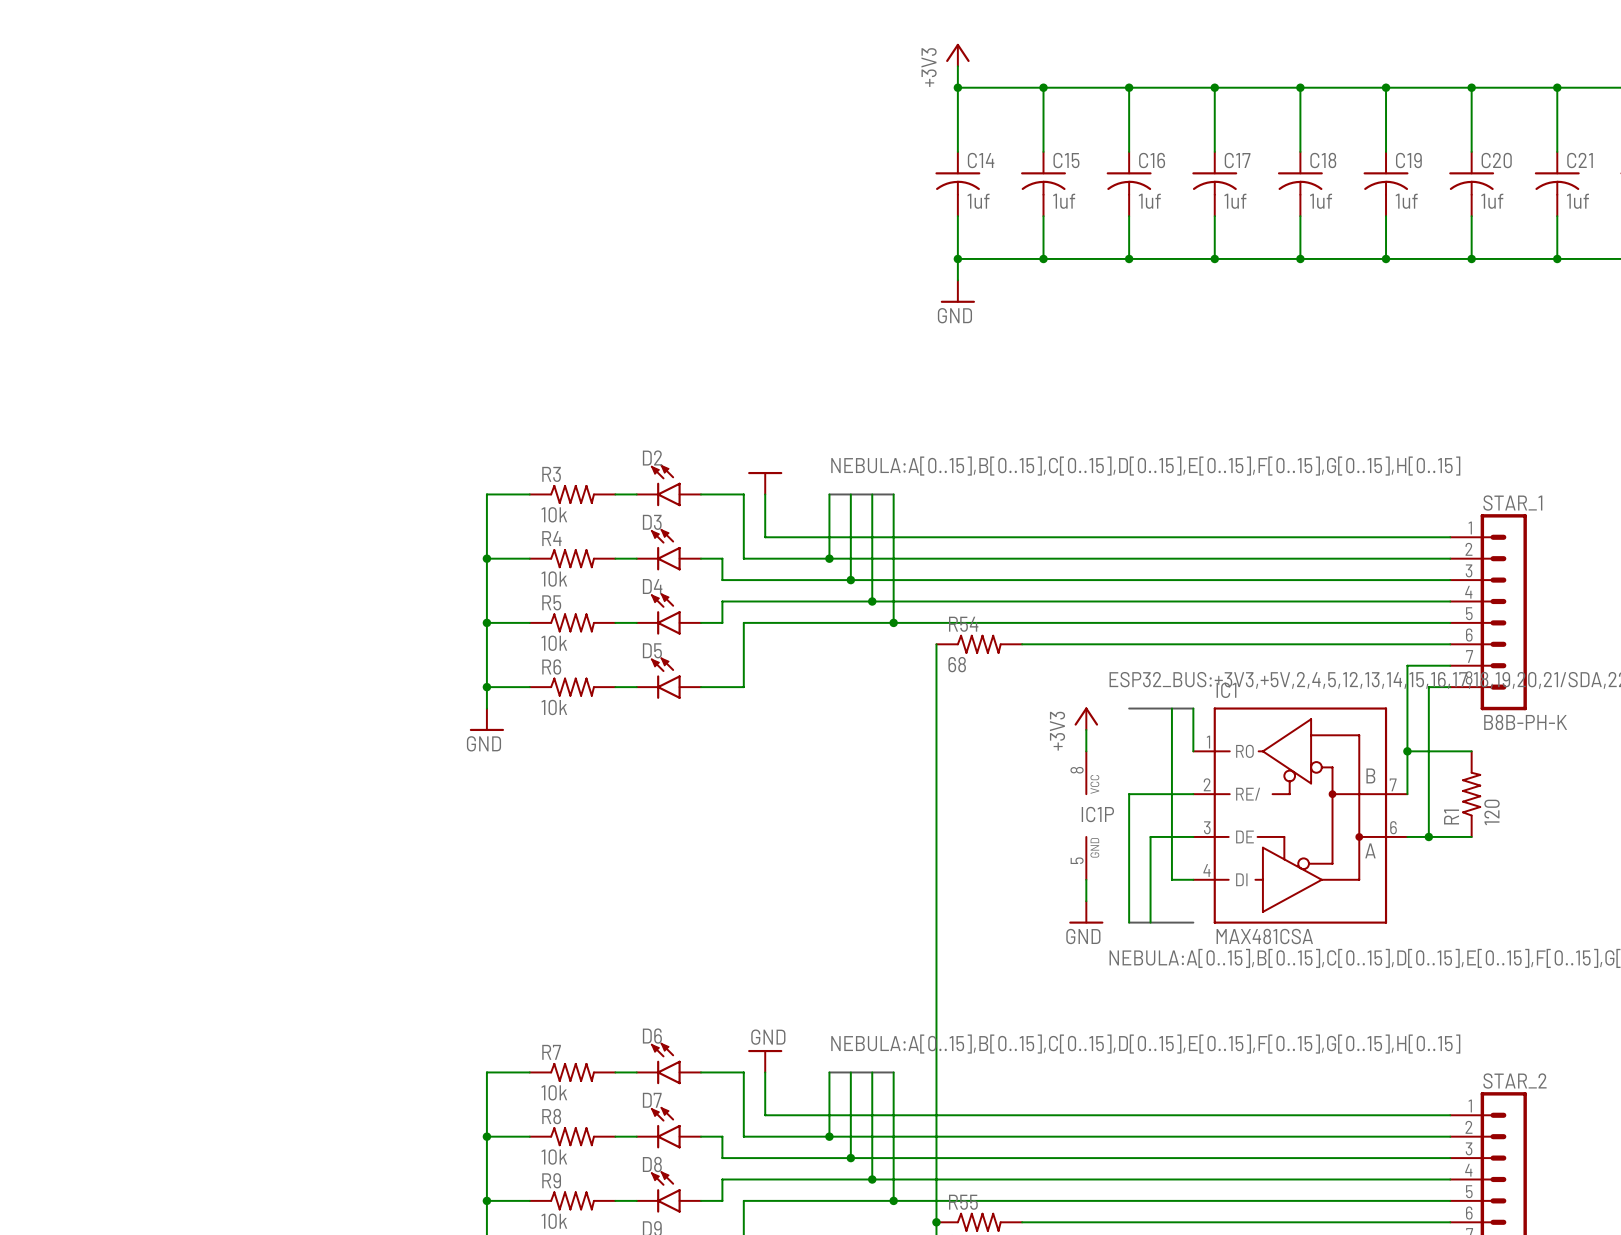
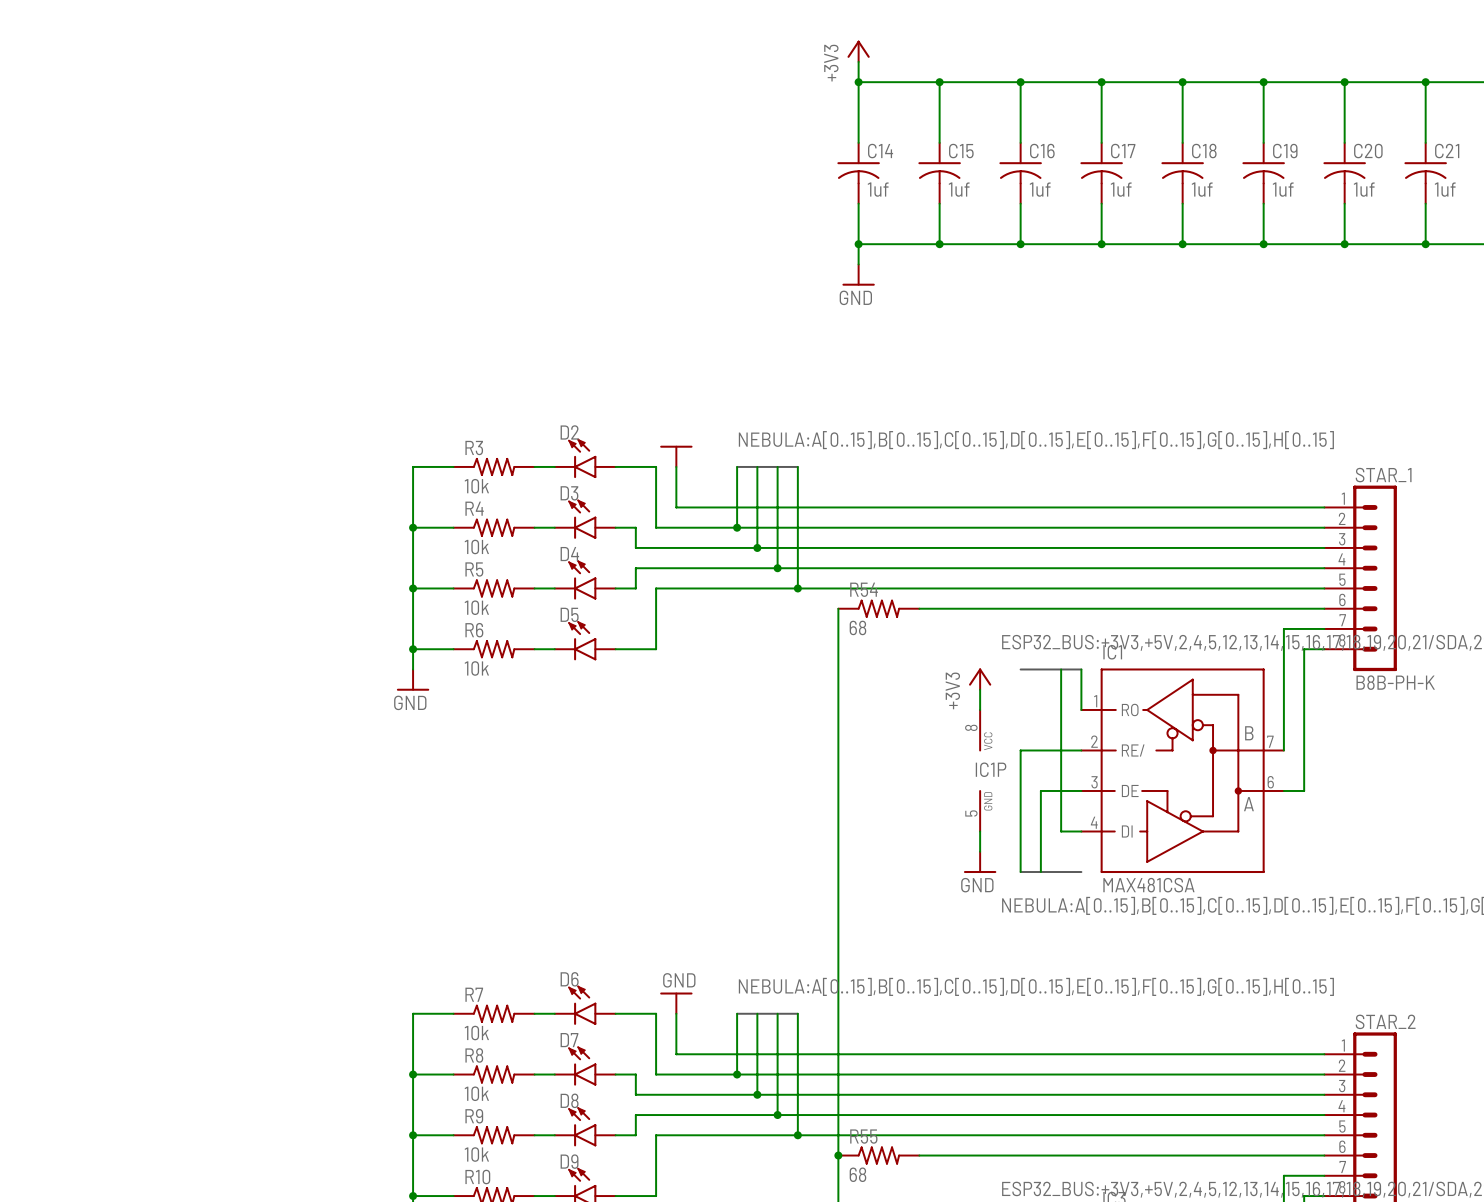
wire: (1407, 751) (1471, 751) -> none
junction: (1407, 751) -> none
R1: 120 (1471, 794) -> none
wire: (1428, 836) (1471, 836) -> none
junction: (1428, 836) -> none

